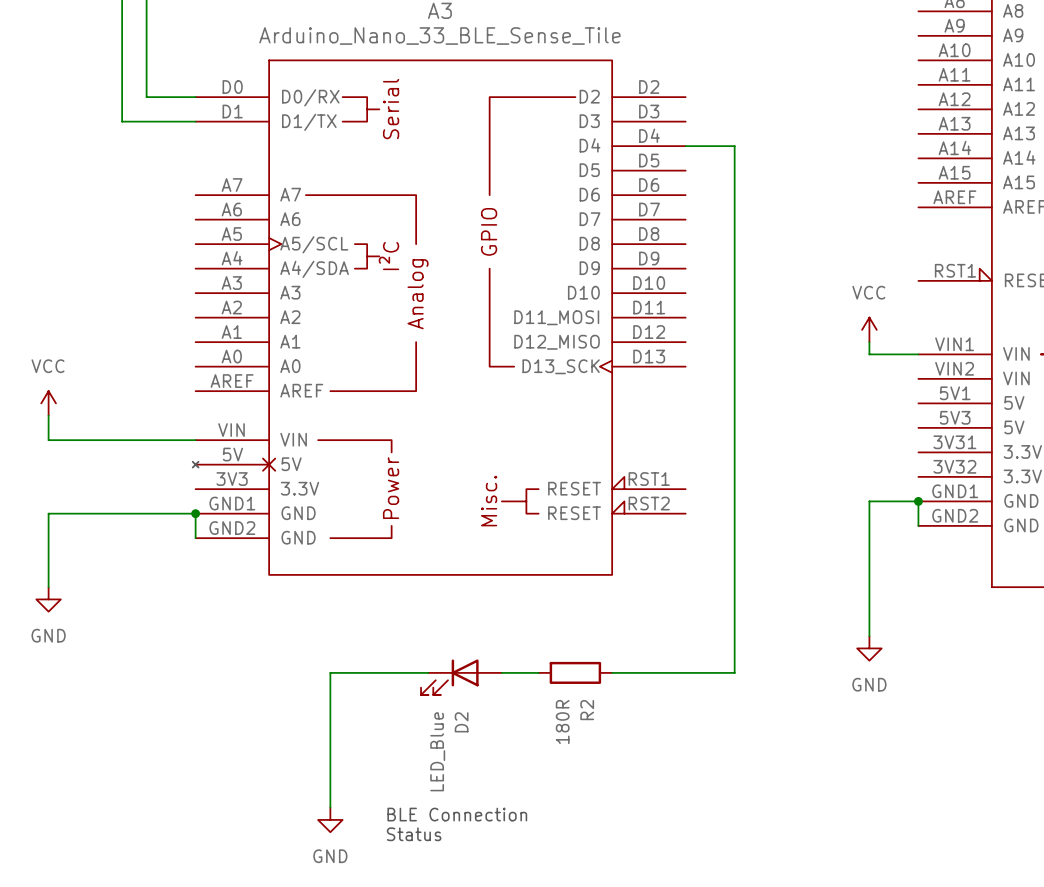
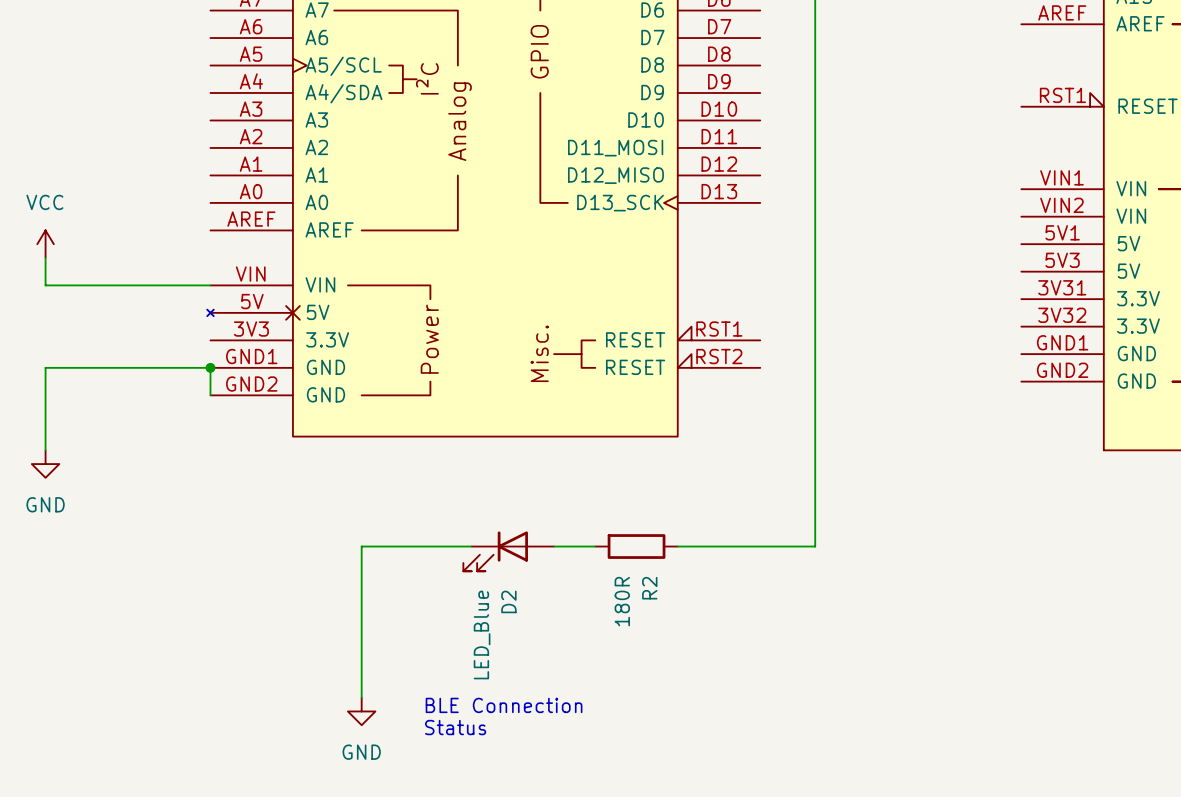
power symbol: VCC (869, 329) -> none
wire: (869, 342) (869, 354) (918, 354) -> none
junction: (918, 501) -> none
wire: (918, 525) (918, 501) (869, 501) (869, 636) -> none
power symbol: GND (869, 648) -> none

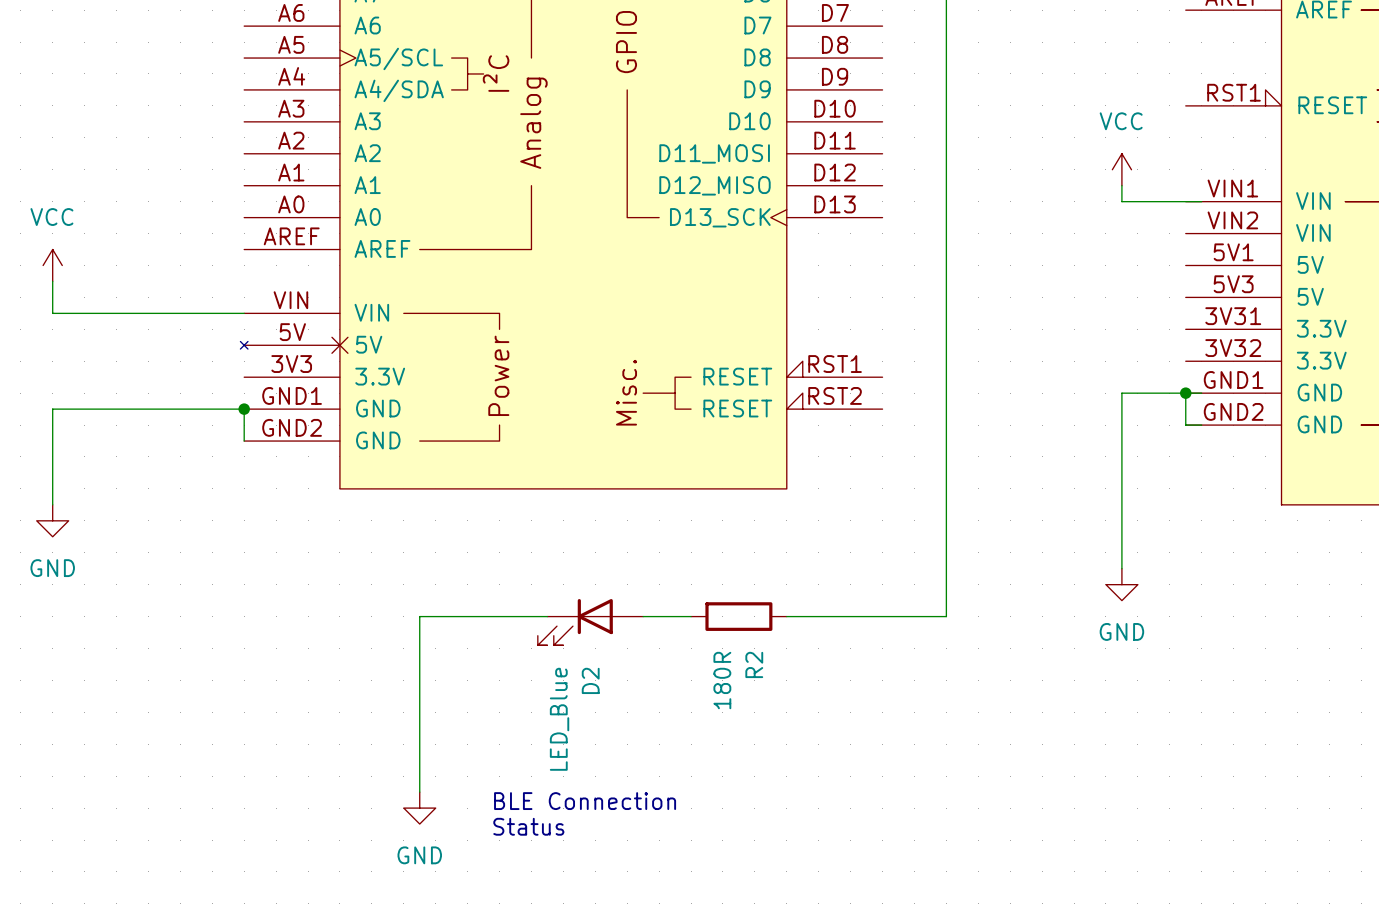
power symbol: none -> VCC (1121, 169)
wire: none -> (1121, 185) (1121, 201) (1201, 201)
wire: none -> (1185, 393) (1185, 425) (1201, 425)
junction: none -> (1185, 393)
wire: none -> (1201, 393) (1121, 393) (1121, 568)
power symbol: none -> GND (1121, 584)

